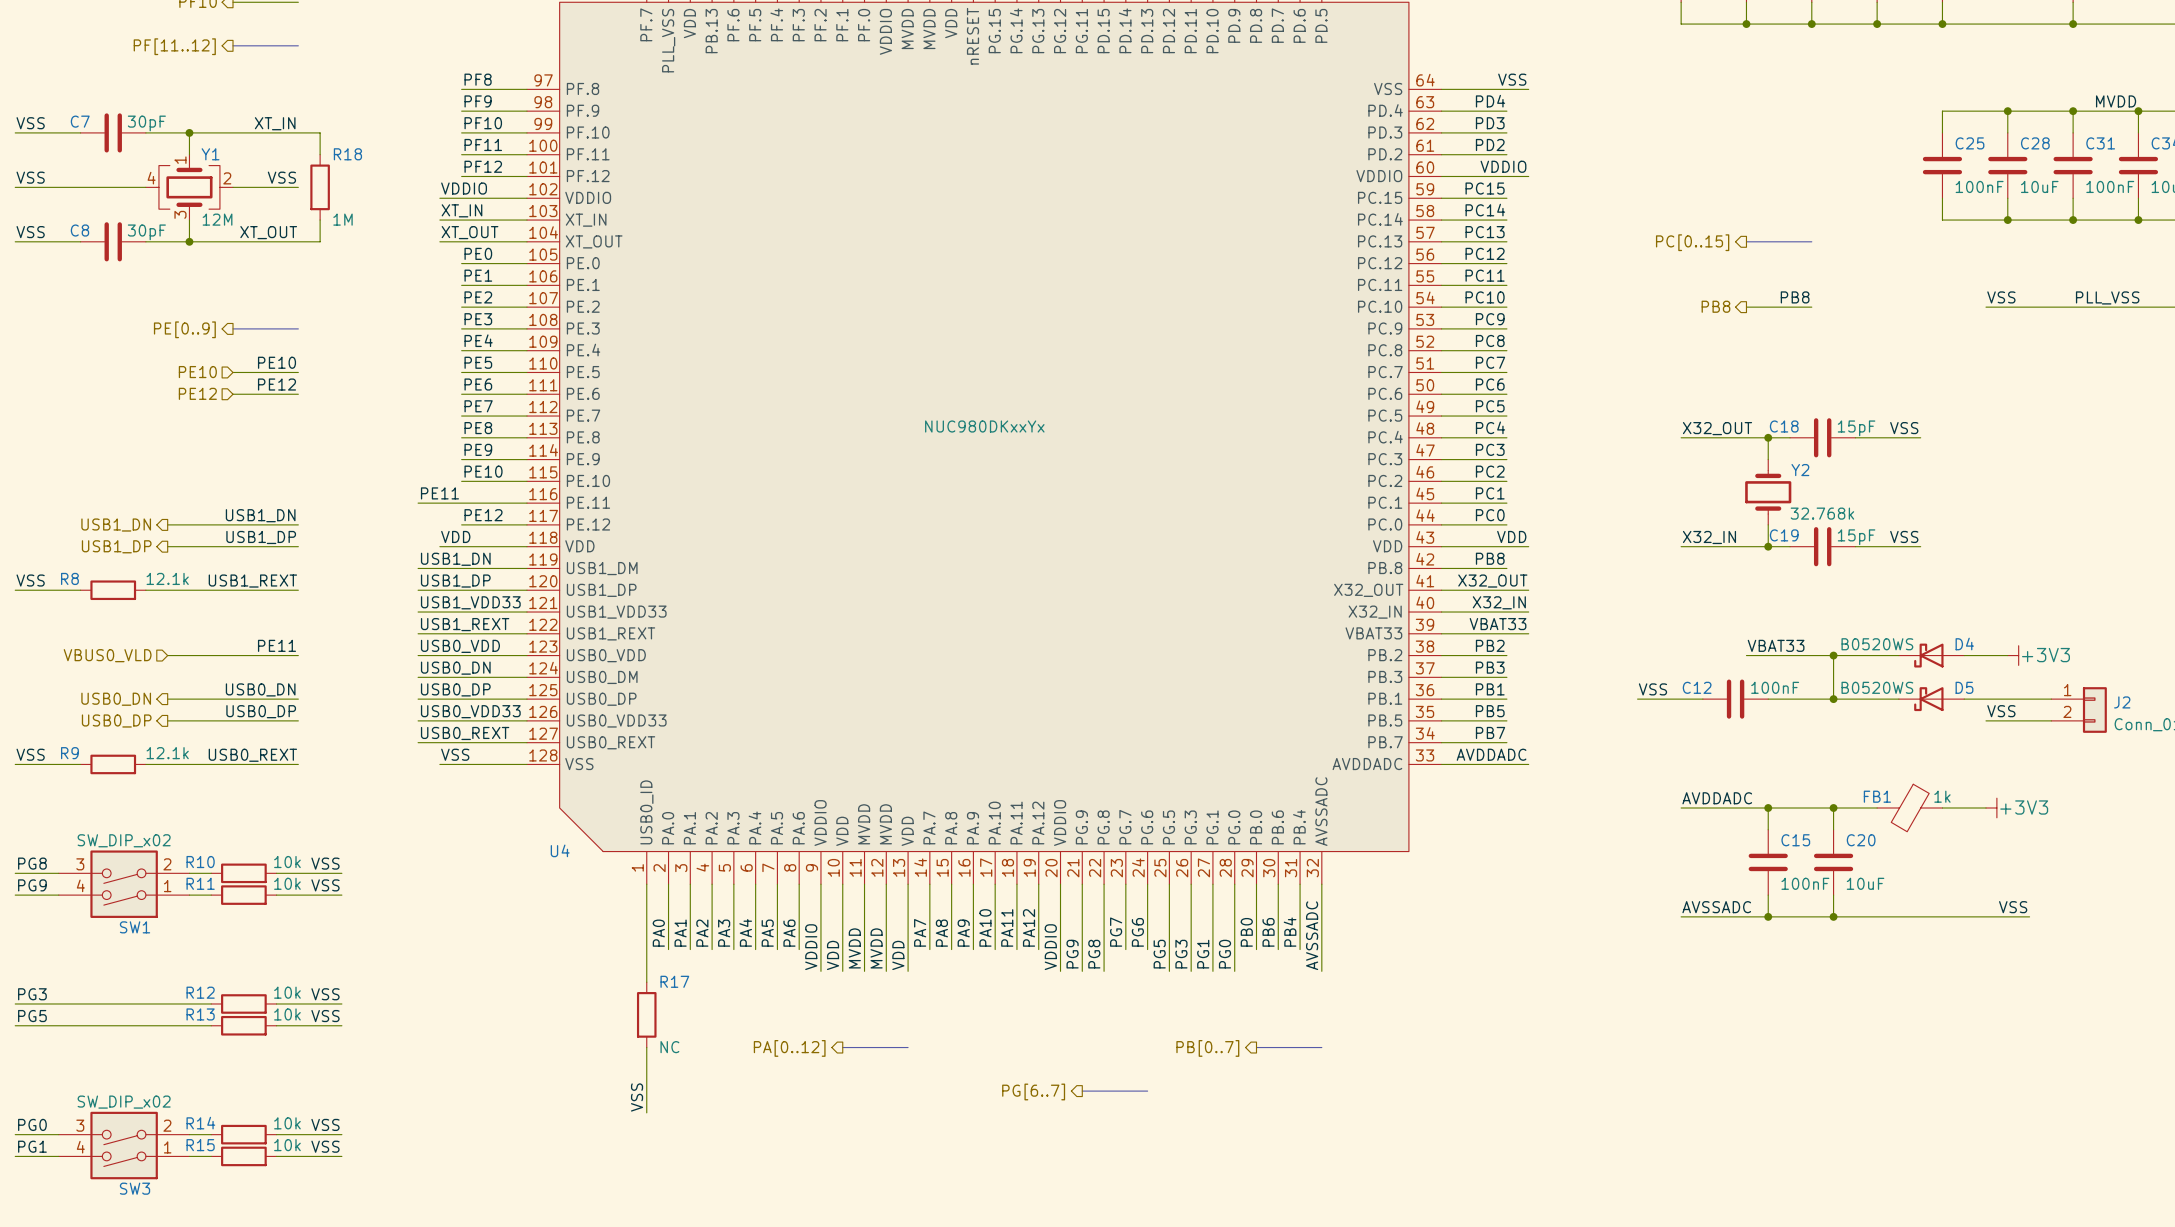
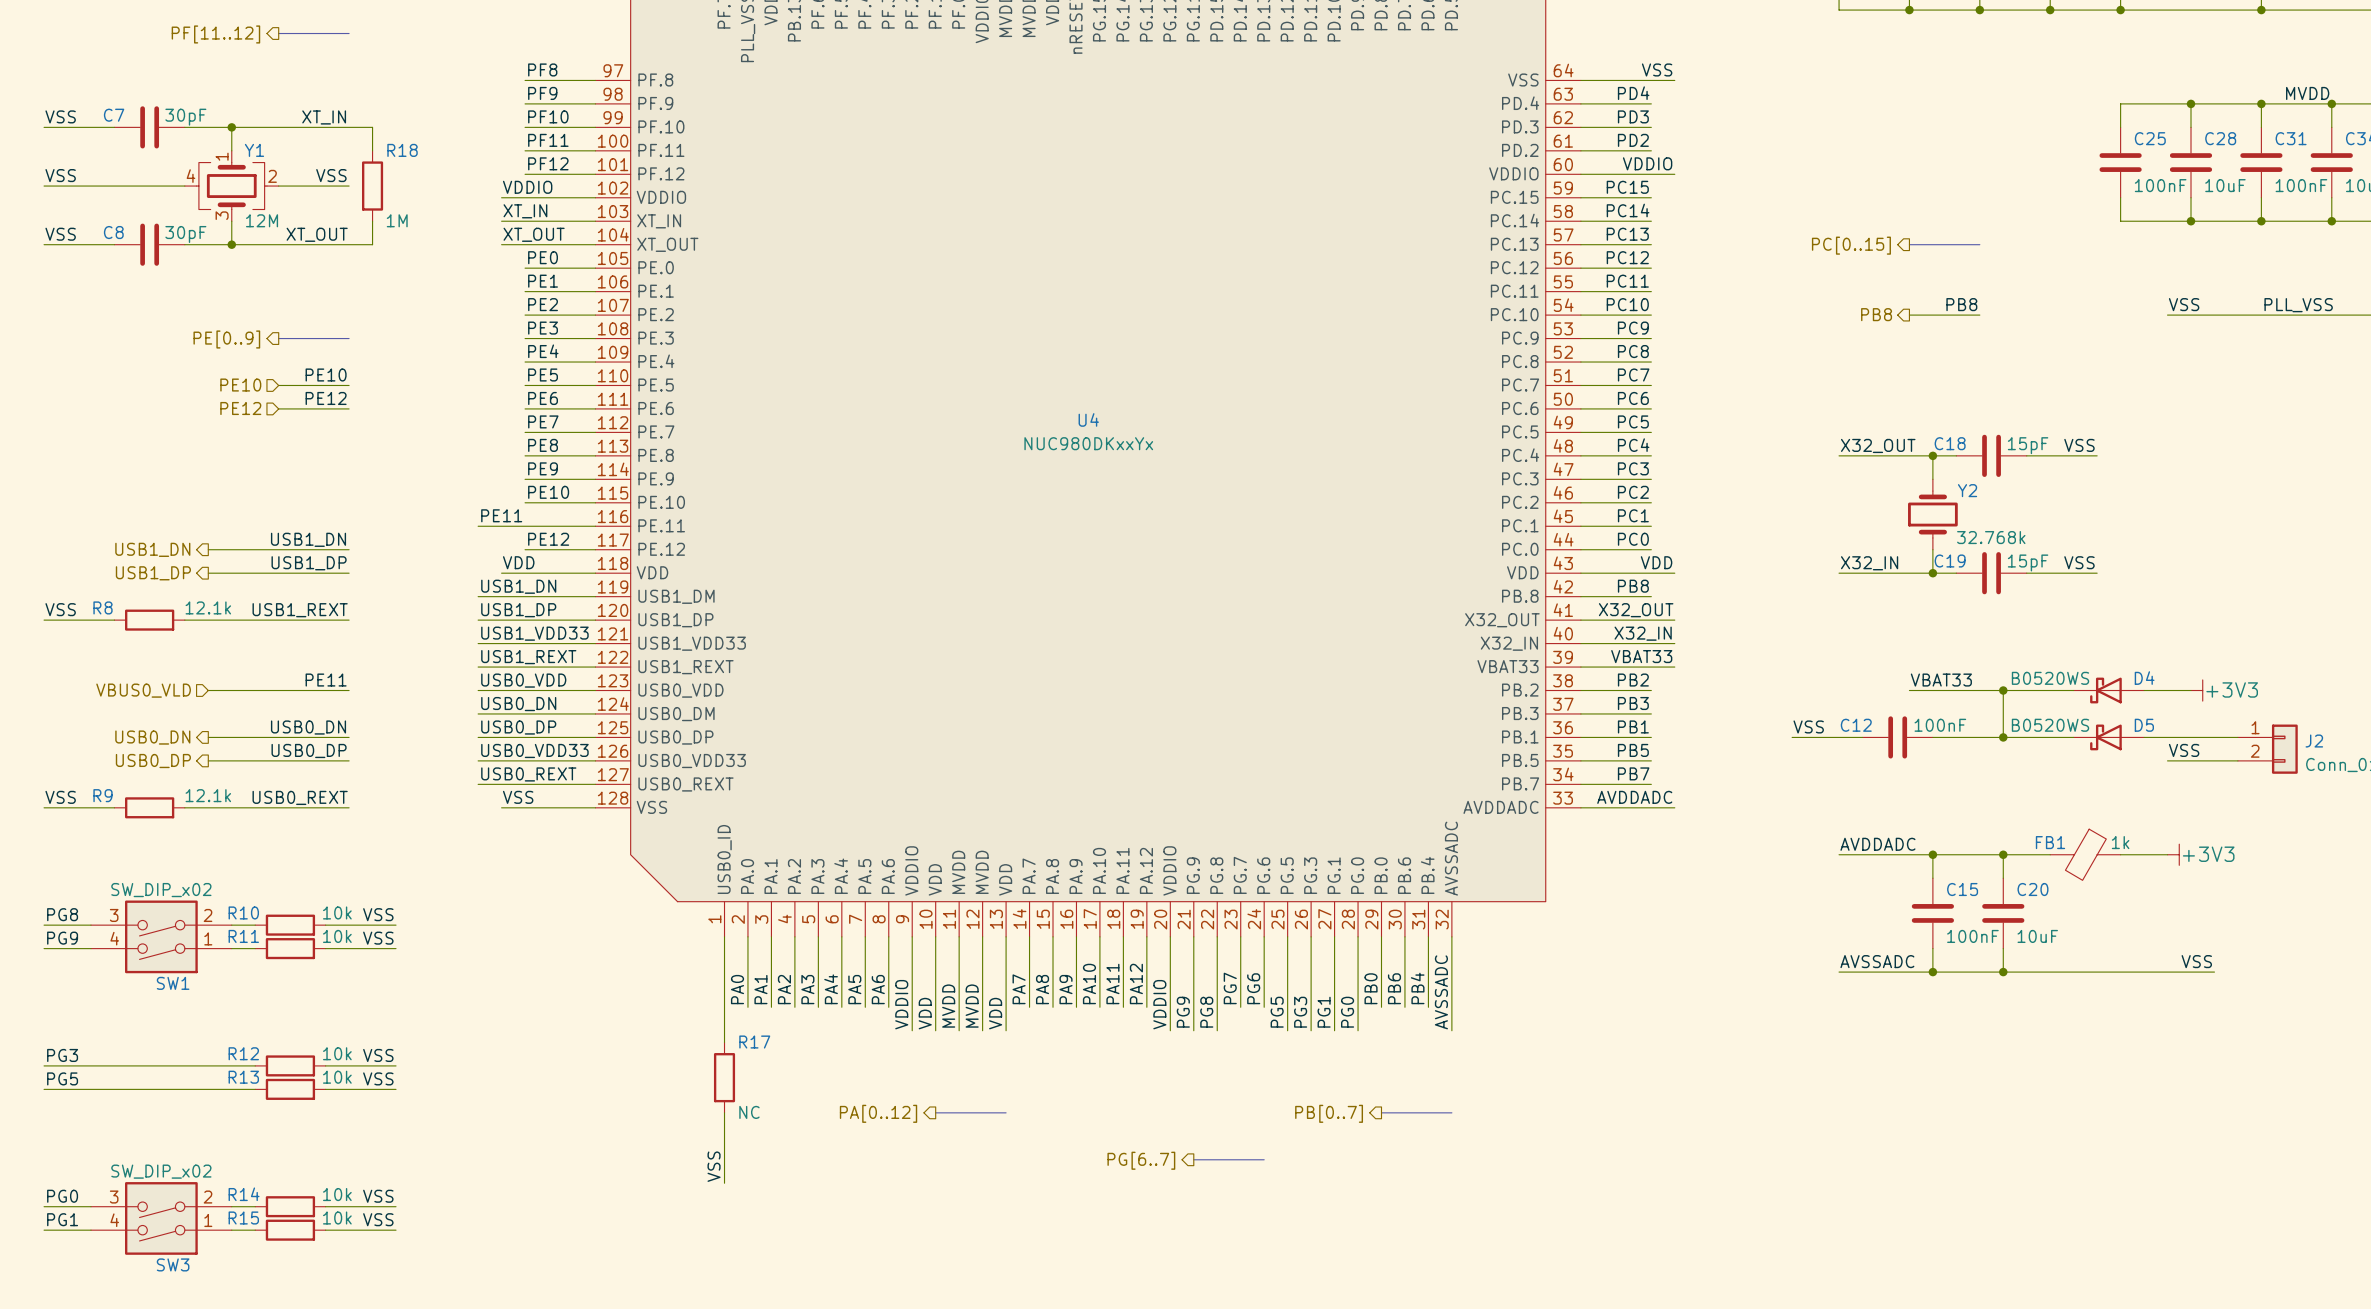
U4 name position: U4 (560, 850) -> U4 (1088, 419)

